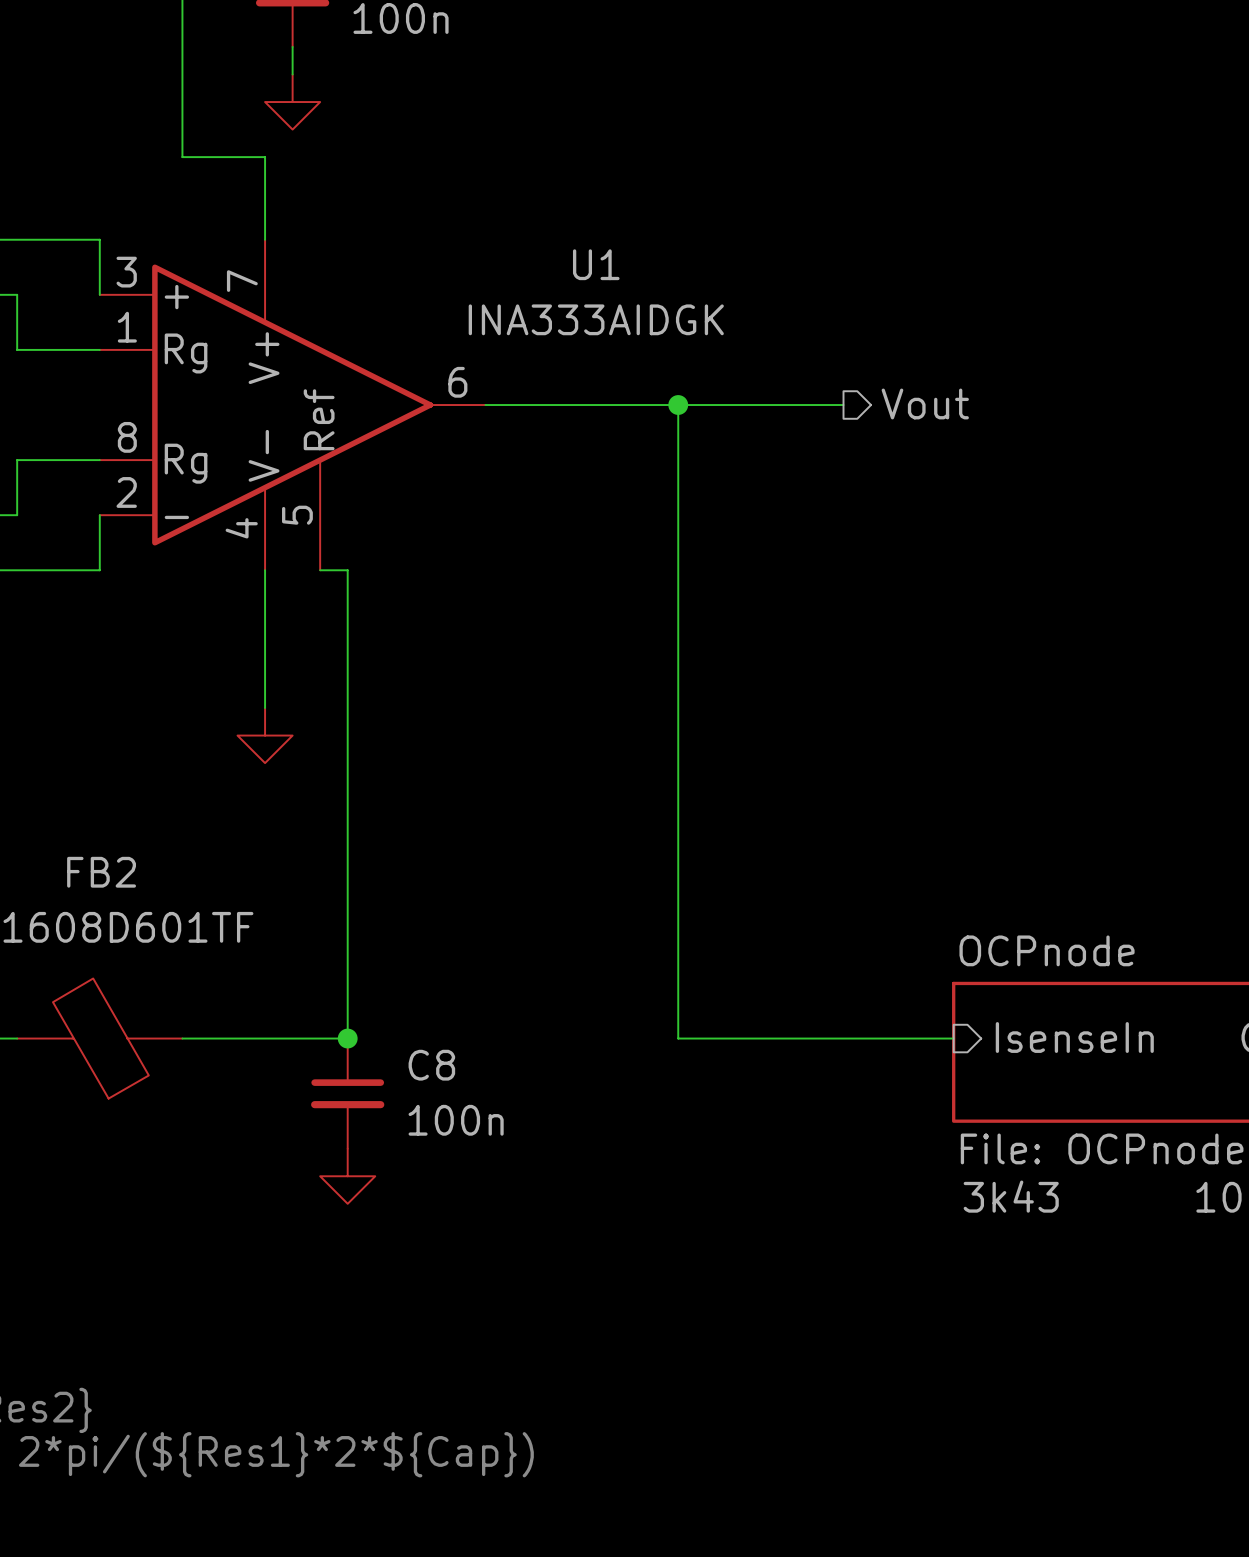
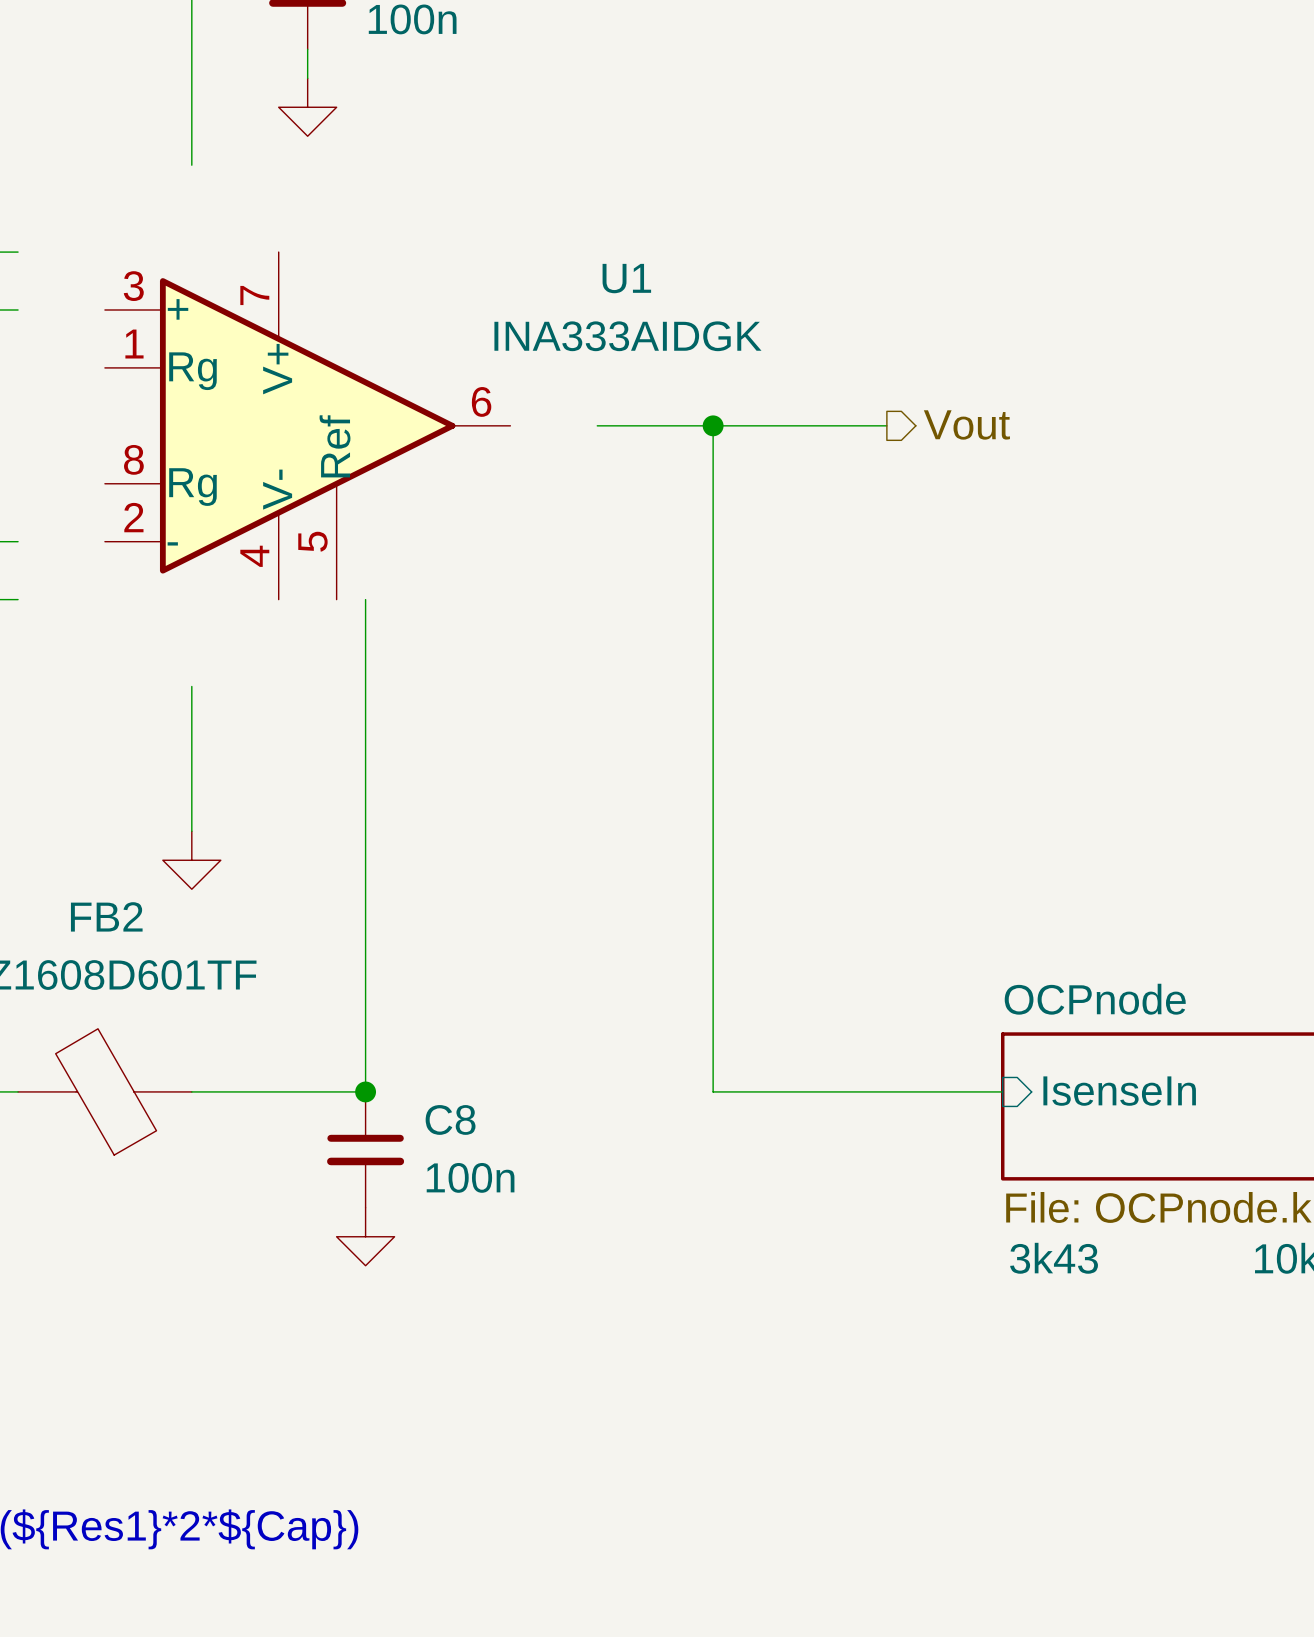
wire: (182, 157) (265, 157) (265, 239) -> none
wire: (17, 239) (99, 239) (99, 294) -> none
wire: (17, 294) (17, 349) (99, 349) -> none
wire: (485, 405) (568, 405) -> none
wire: (99, 460) (17, 460) (17, 515) -> none
wire: (99, 515) (99, 570) (17, 570) -> none
wire: (265, 570) (265, 708) -> (191, 686) (191, 831)
wire: (320, 570) (347, 570) -> none
power symbol position: (265, 735) -> (191, 860)

